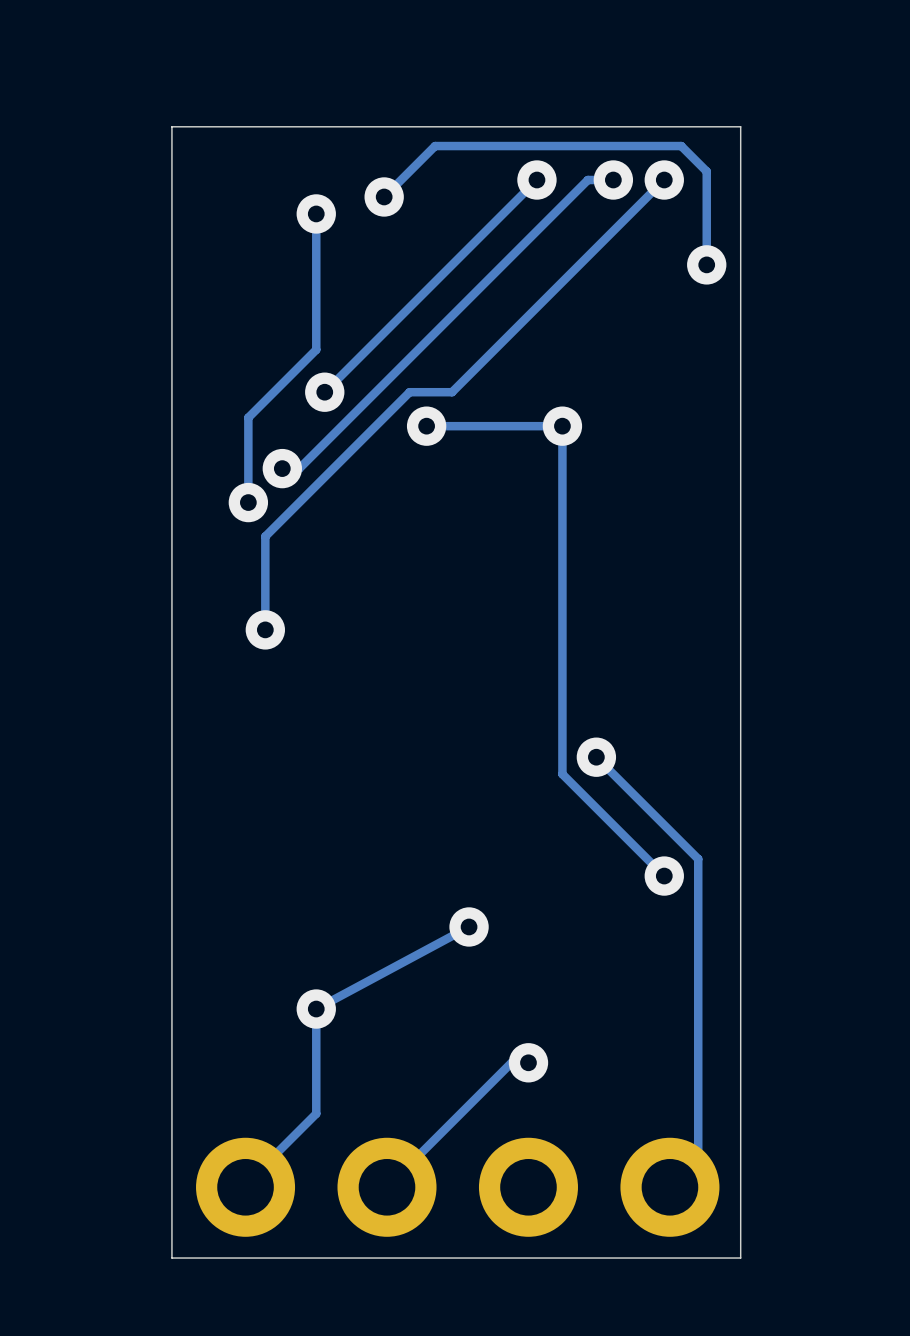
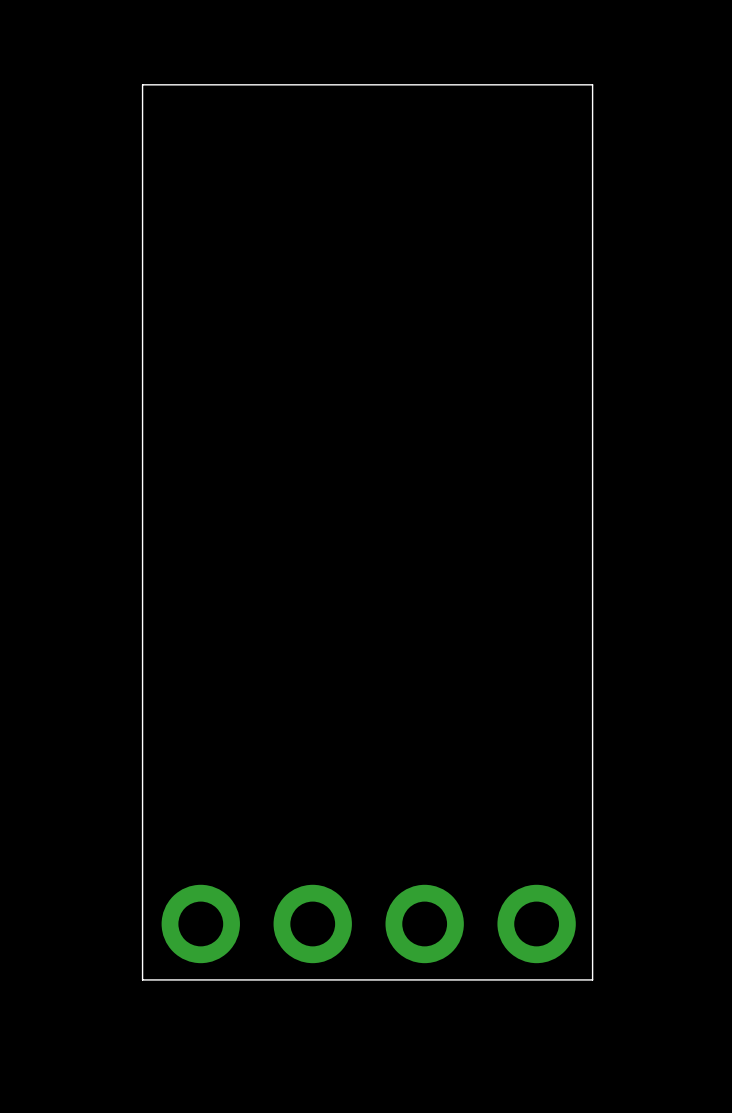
track: (536, 180) (324, 392) -> none
via: (536, 180) -> none
track: (613, 180) (587, 180) (299, 468) (282, 468) -> none
via: (613, 180) -> none
track: (664, 180) (452, 392) (409, 392) (265, 536) (265, 629) -> none
via: (664, 180) -> none
track: (384, 196) (435, 146) (681, 146) (706, 171) (706, 264) -> none
via: (384, 196) -> none
track: (316, 213) (316, 349) (248, 417) (248, 502) -> none
via: (316, 213) -> none
via: (706, 264) -> none
via: (324, 392) -> none
track: (426, 426) (562, 426) (562, 774) (664, 876) -> none
via: (426, 426) -> none
via: (562, 426) -> none
via: (282, 468) -> none
via: (248, 502) -> none
via: (265, 629) -> none
track: (596, 757) (698, 859) (698, 1156) (672, 1181) (669, 1187) -> none
via: (596, 757) -> none
via: (664, 876) -> none
track: (469, 926) (316, 1009) (316, 1113) (248, 1181) (245, 1187) -> none
via: (469, 926) -> none
via: (316, 1009) -> none
track: (528, 1062) (511, 1062) (387, 1187) -> none
via: (528, 1062) -> none

